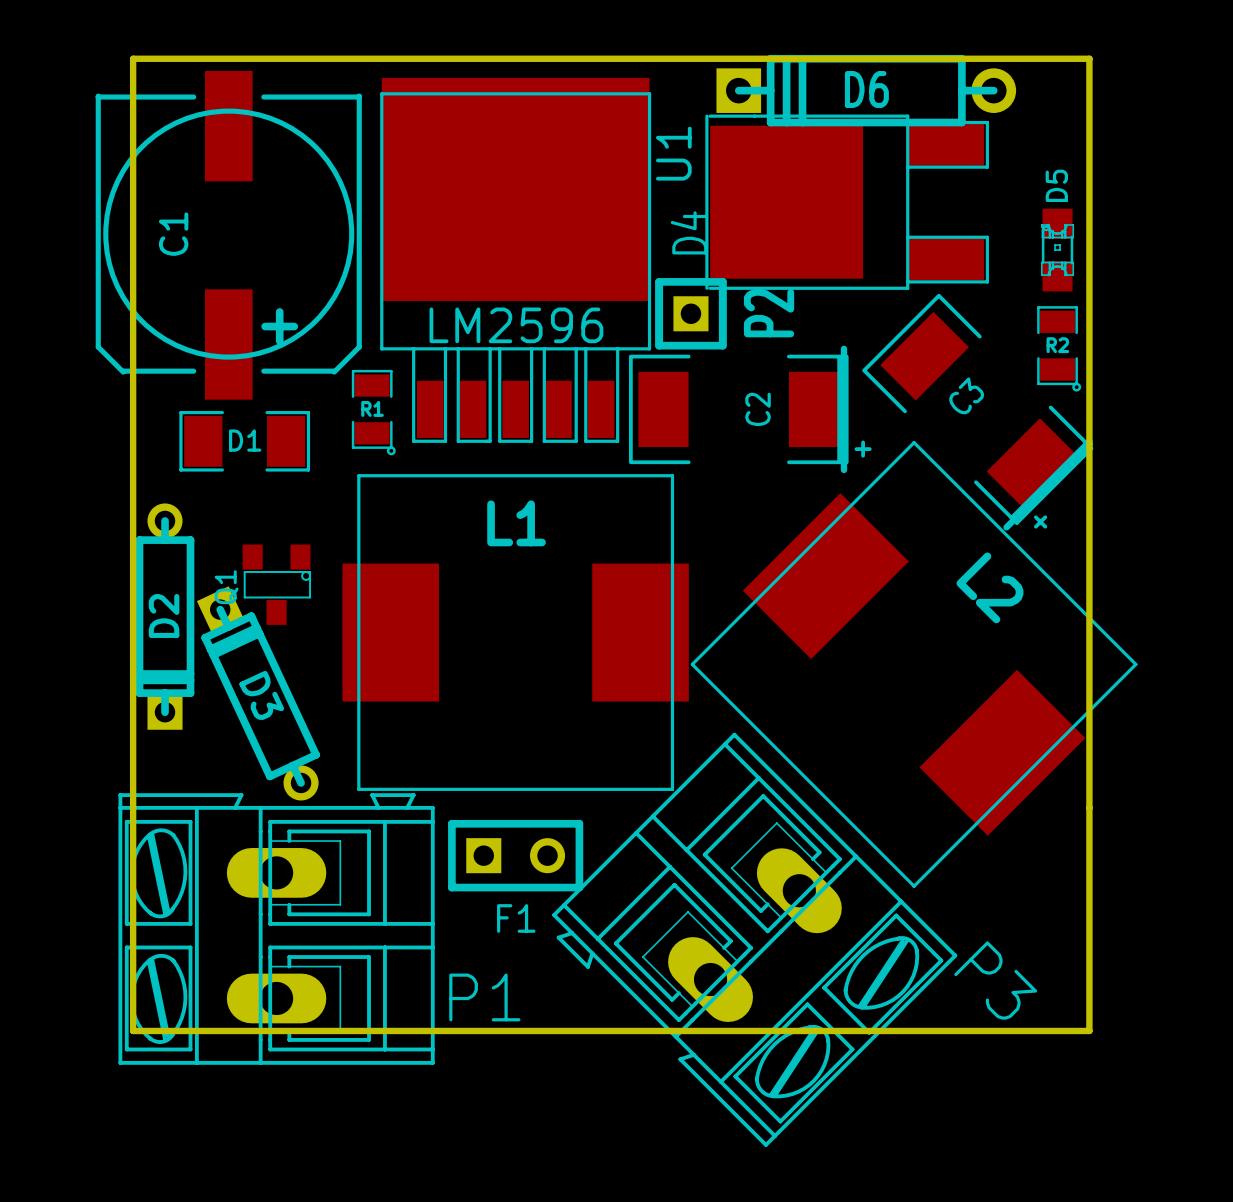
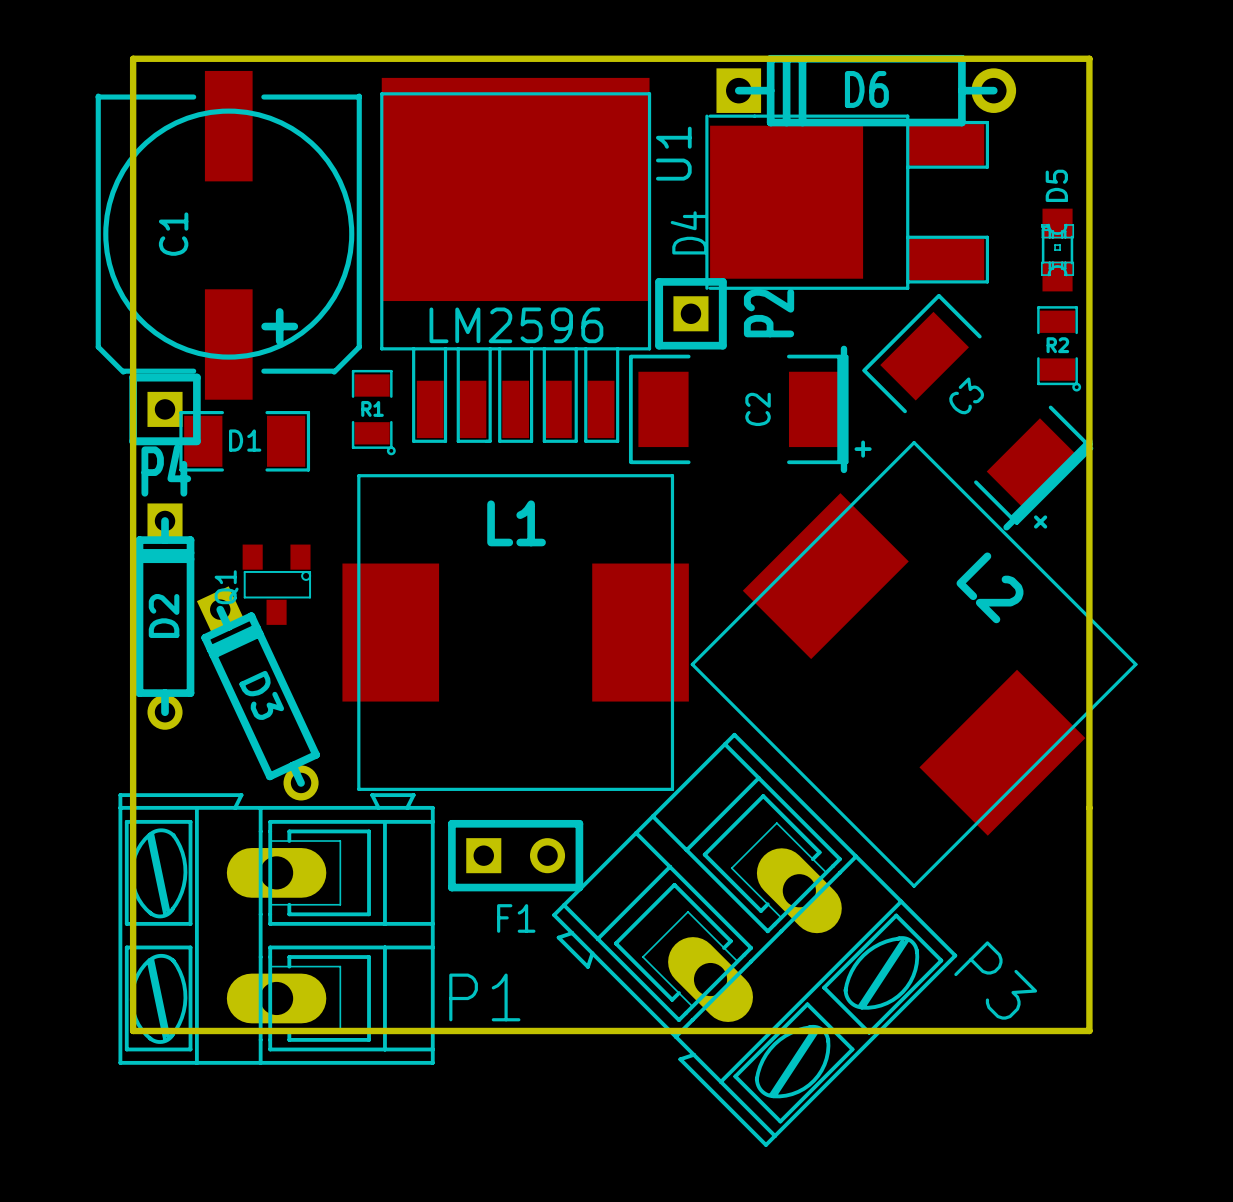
P4: none -> (165, 409)
D2 rotation: 0° (165, 616) -> 180° (165, 616)

